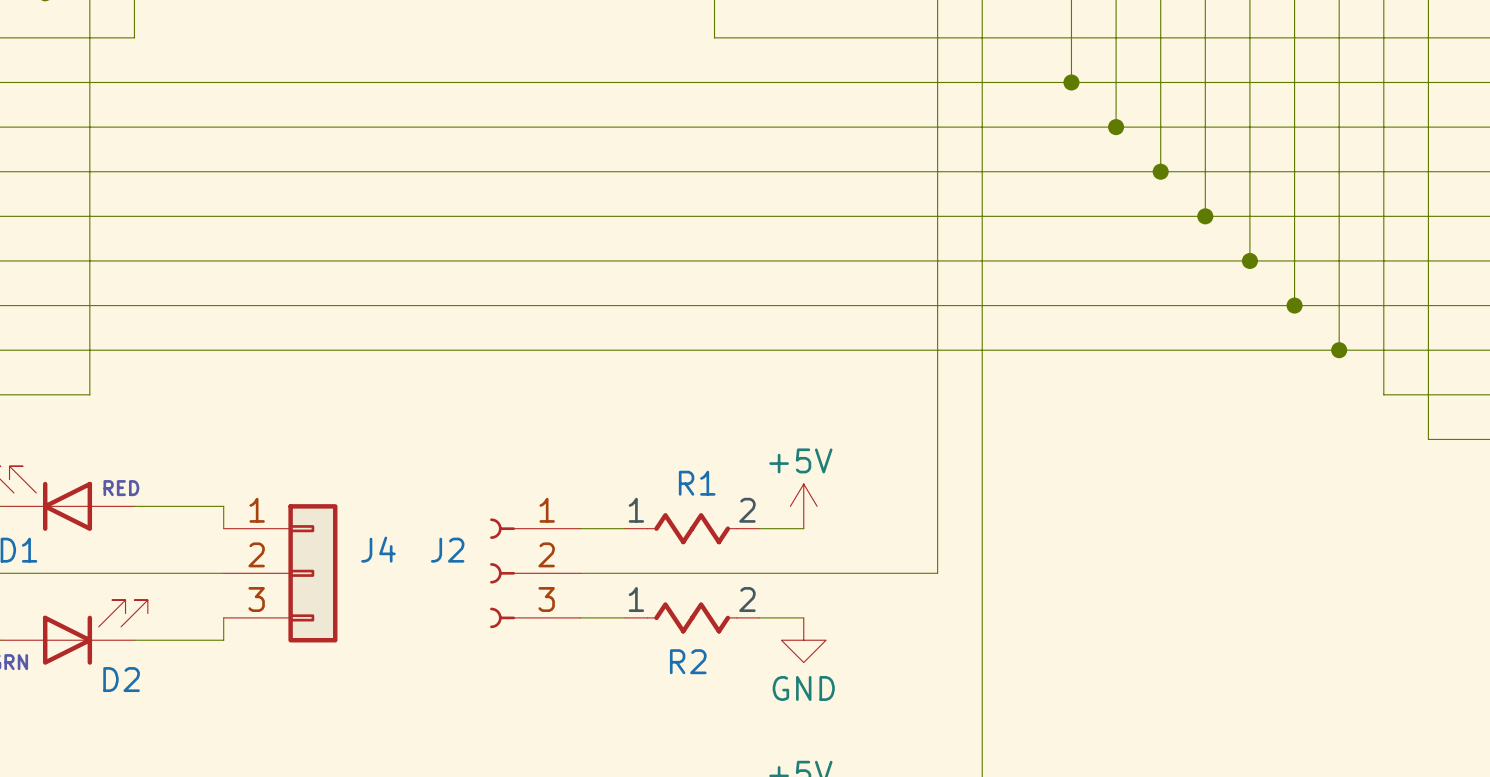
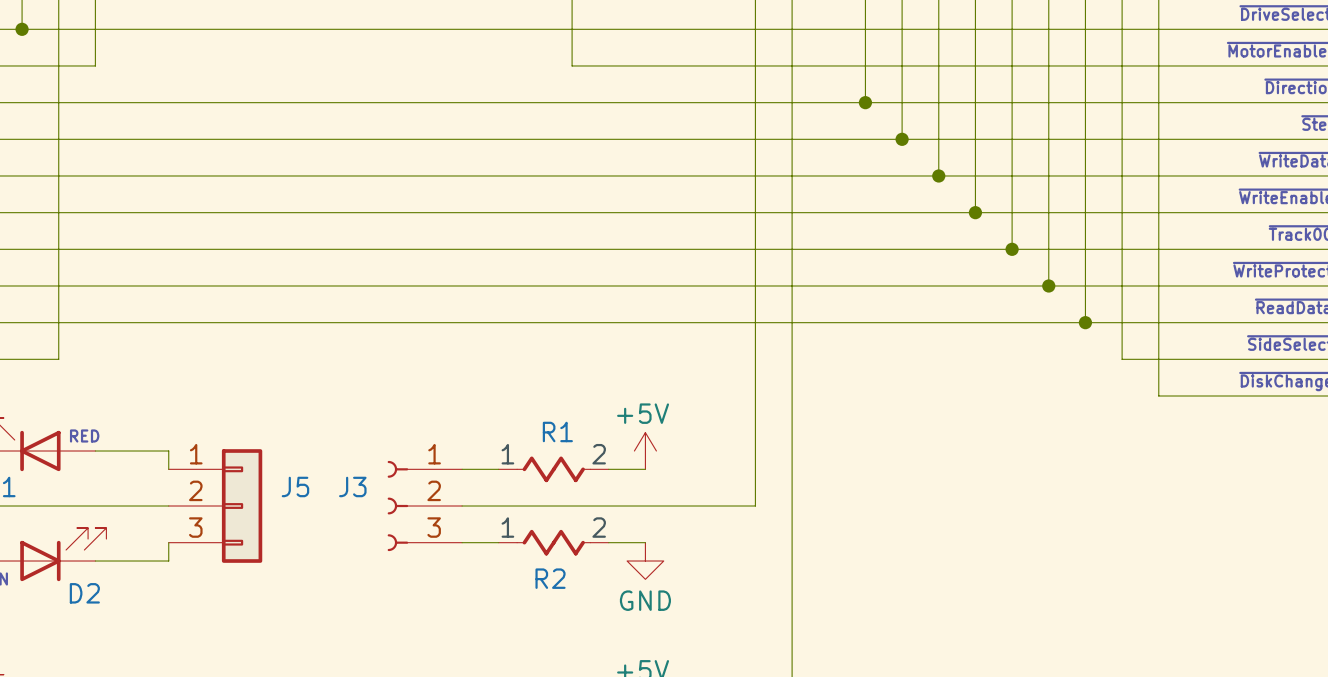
J4 name: J4 (378, 549) -> J5 (295, 486)
J2 name: J2 (447, 550) -> J3 (352, 486)

